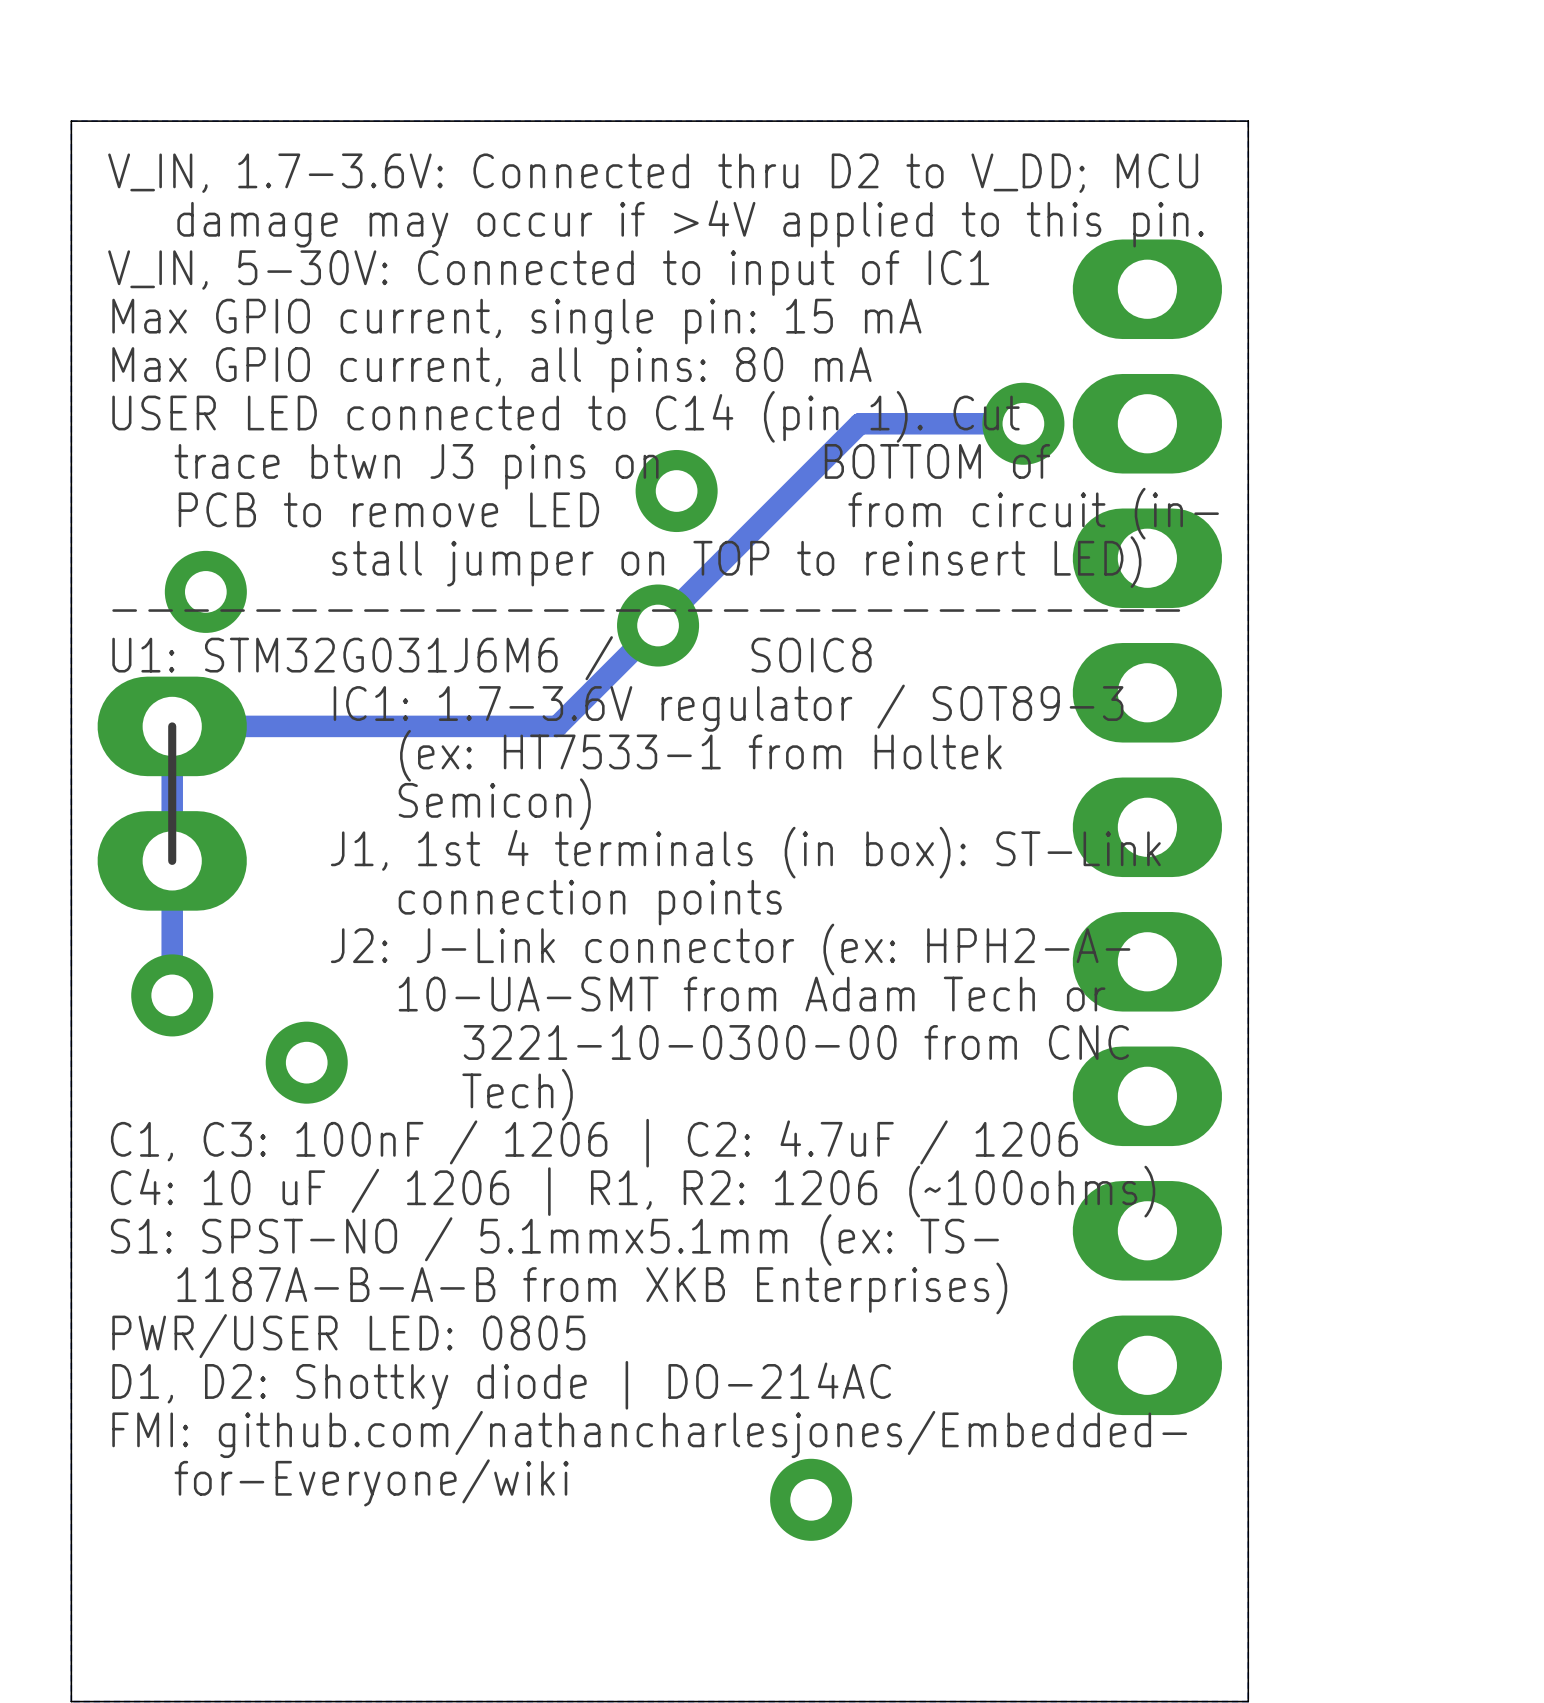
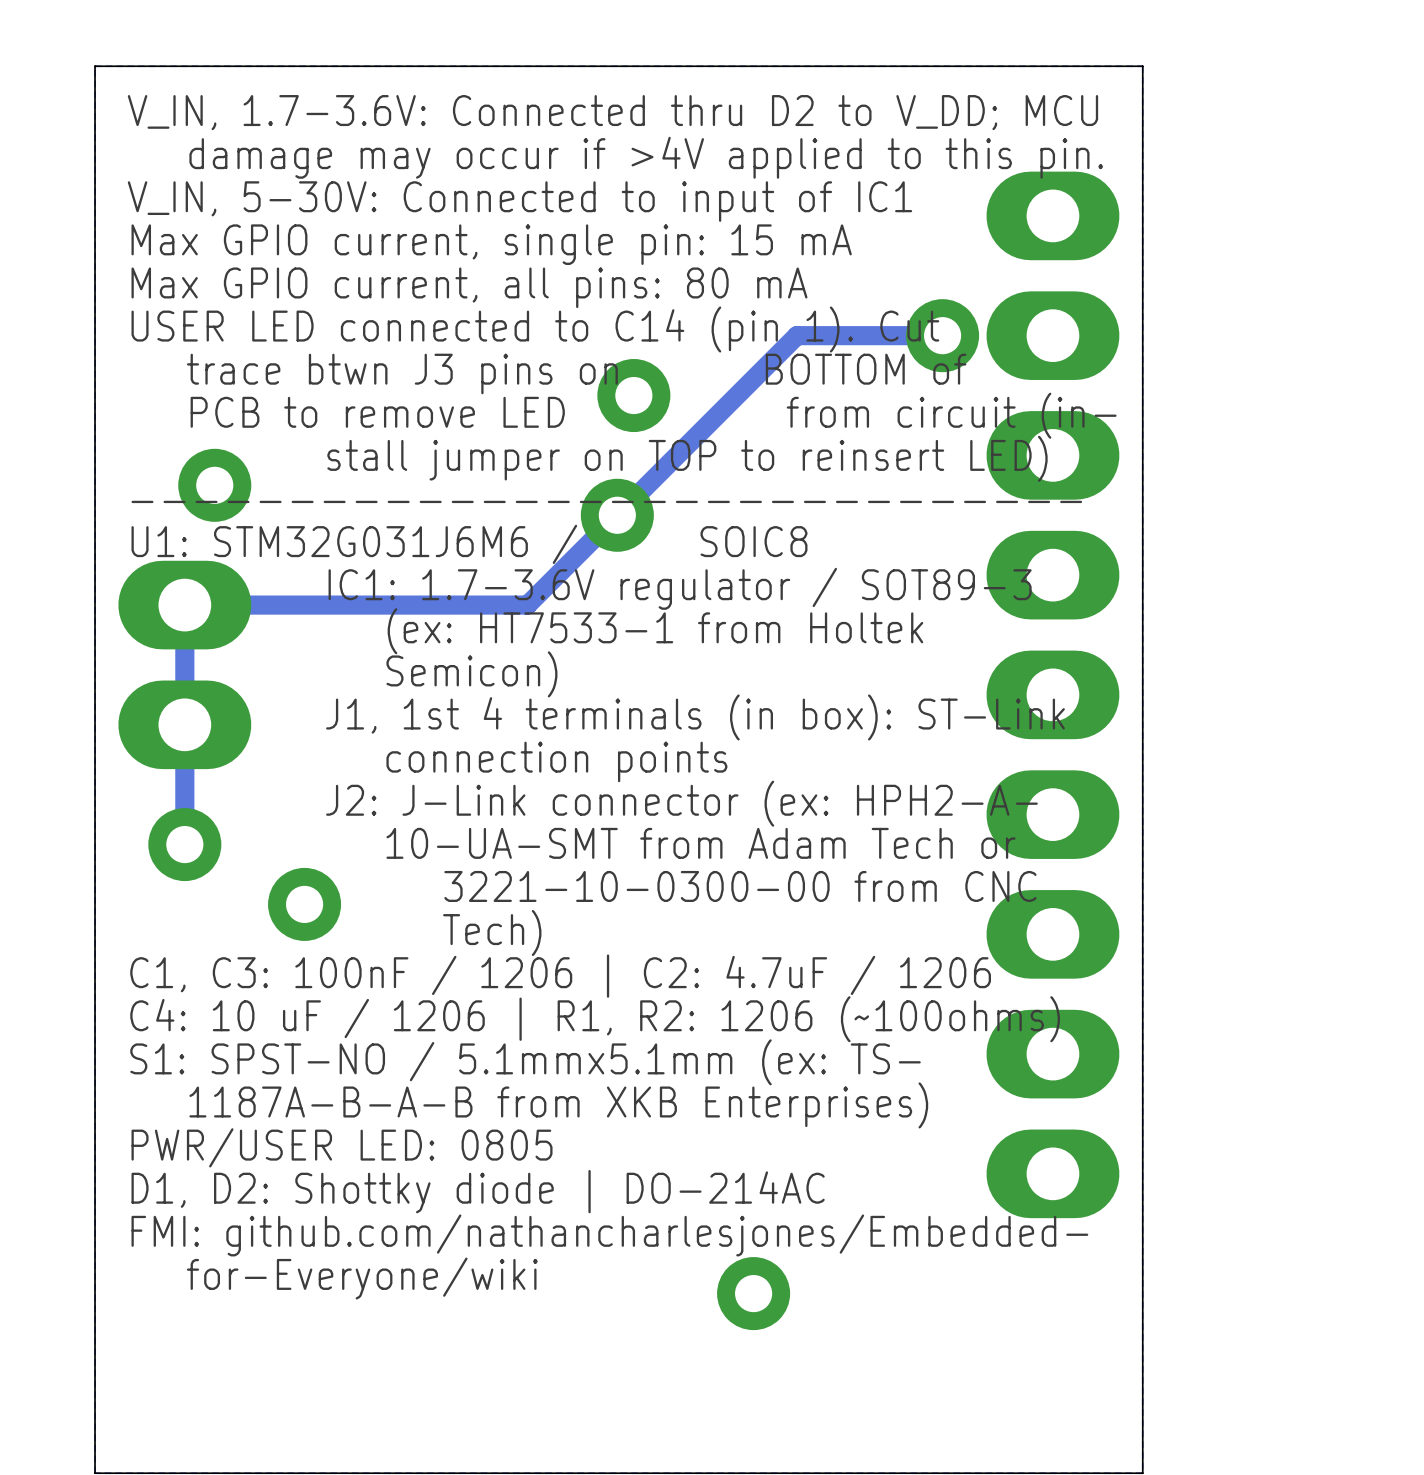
line: (172, 726) (172, 860) -> none

